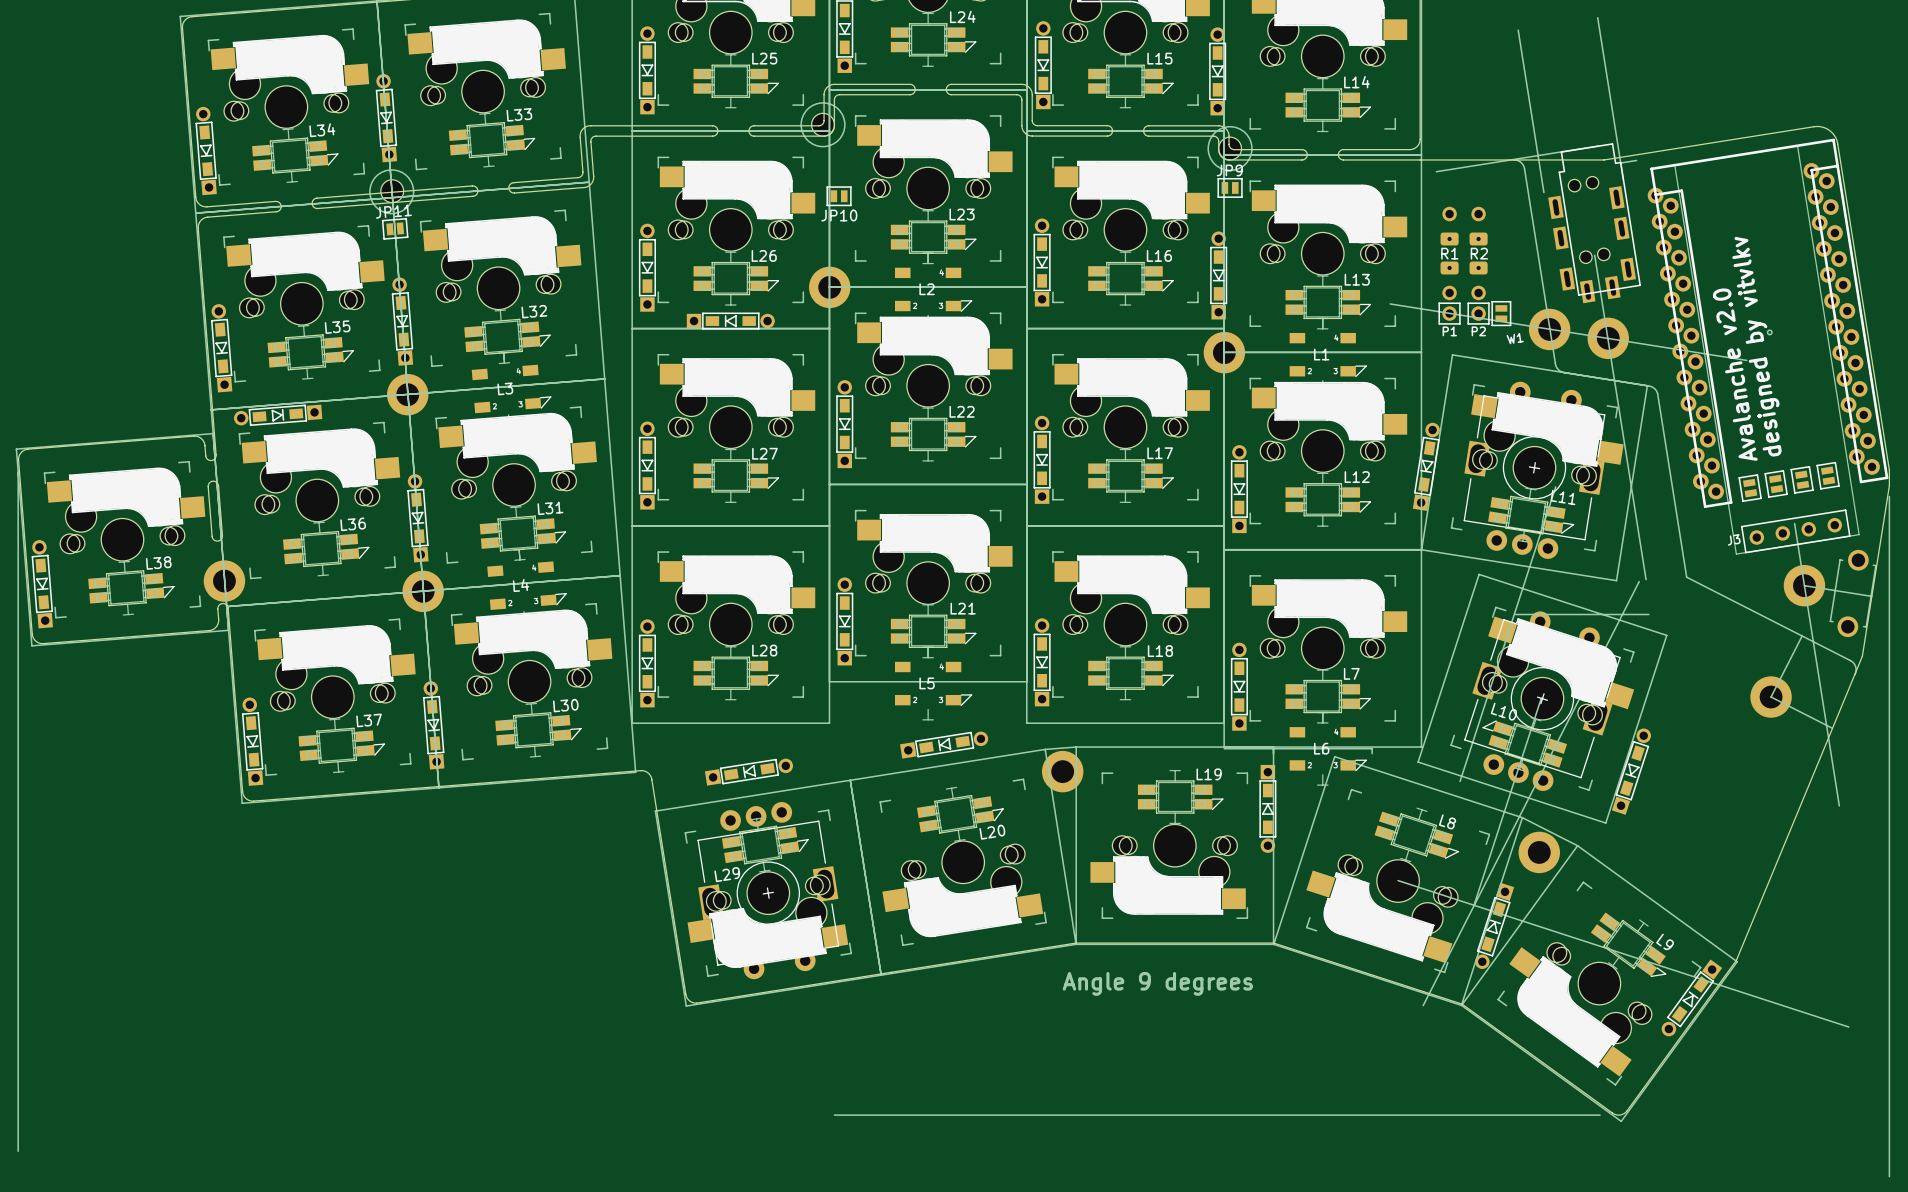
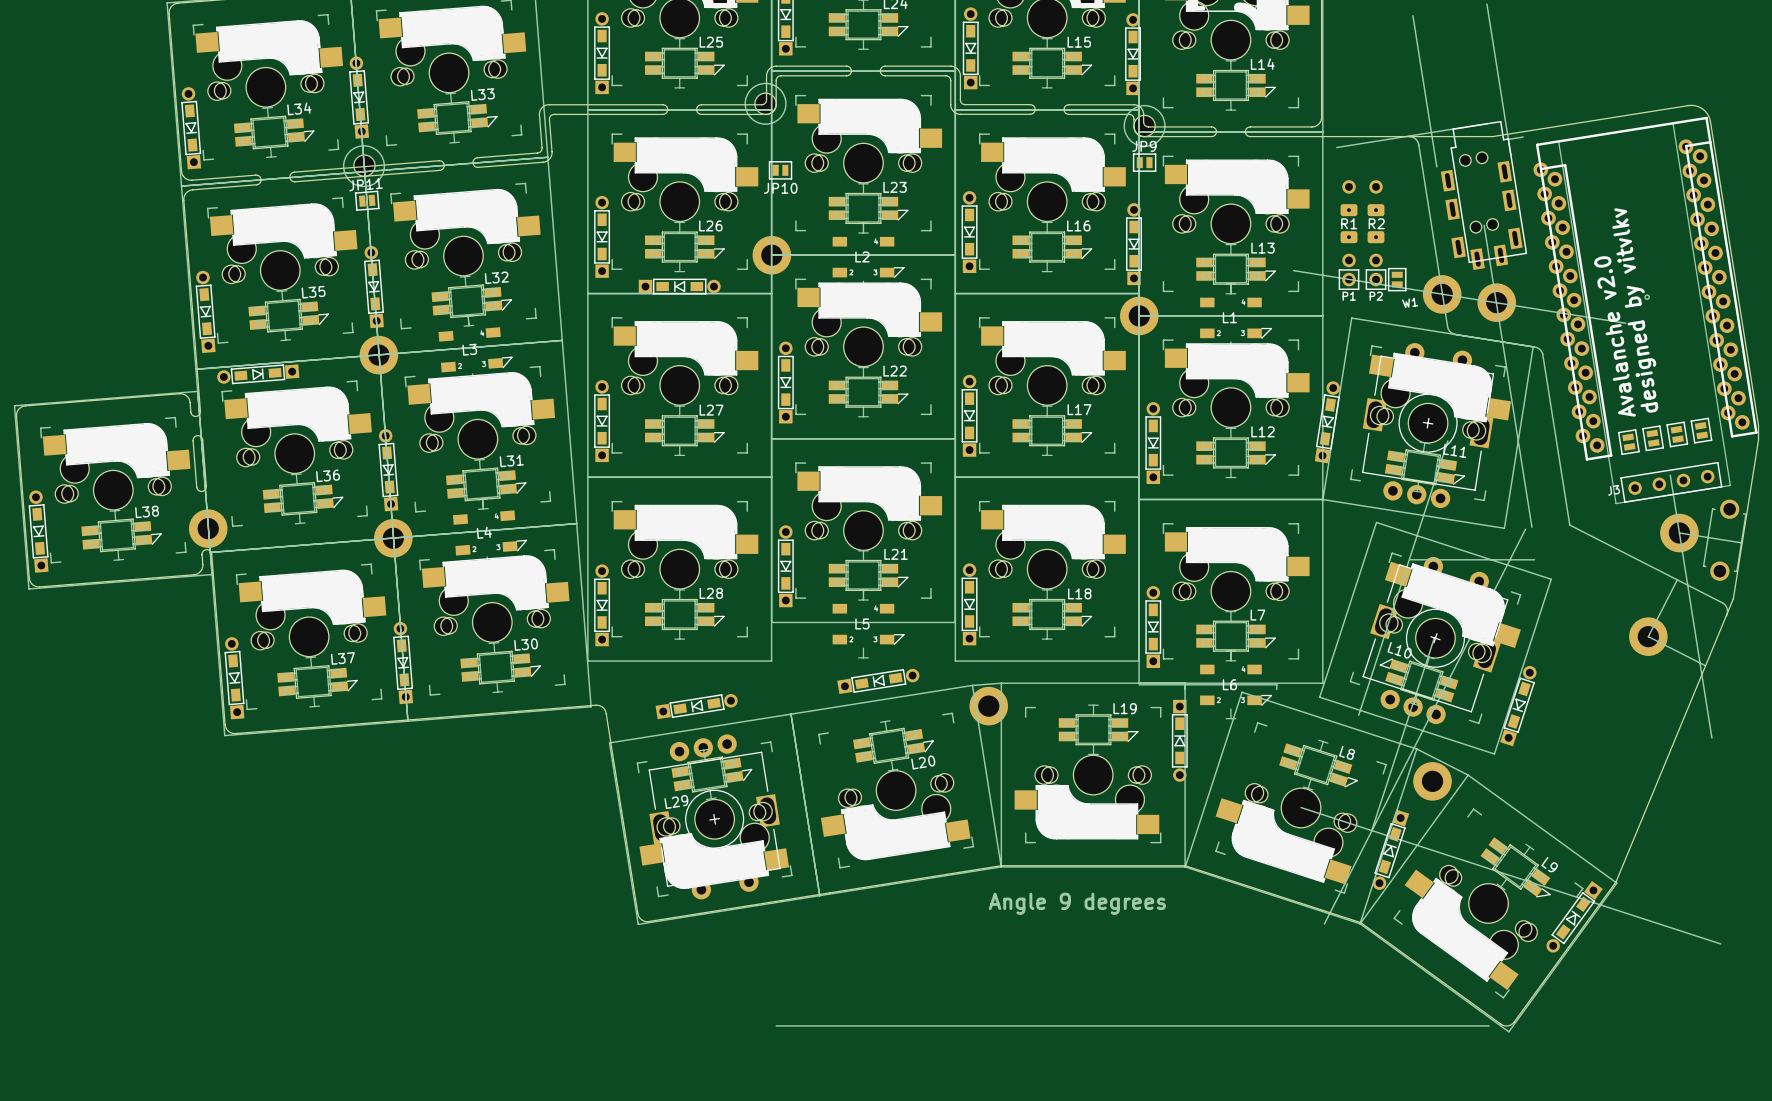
line: (18, 472) (18, 1151) -> none
line: (1889, 496) (1889, 1176) -> none

